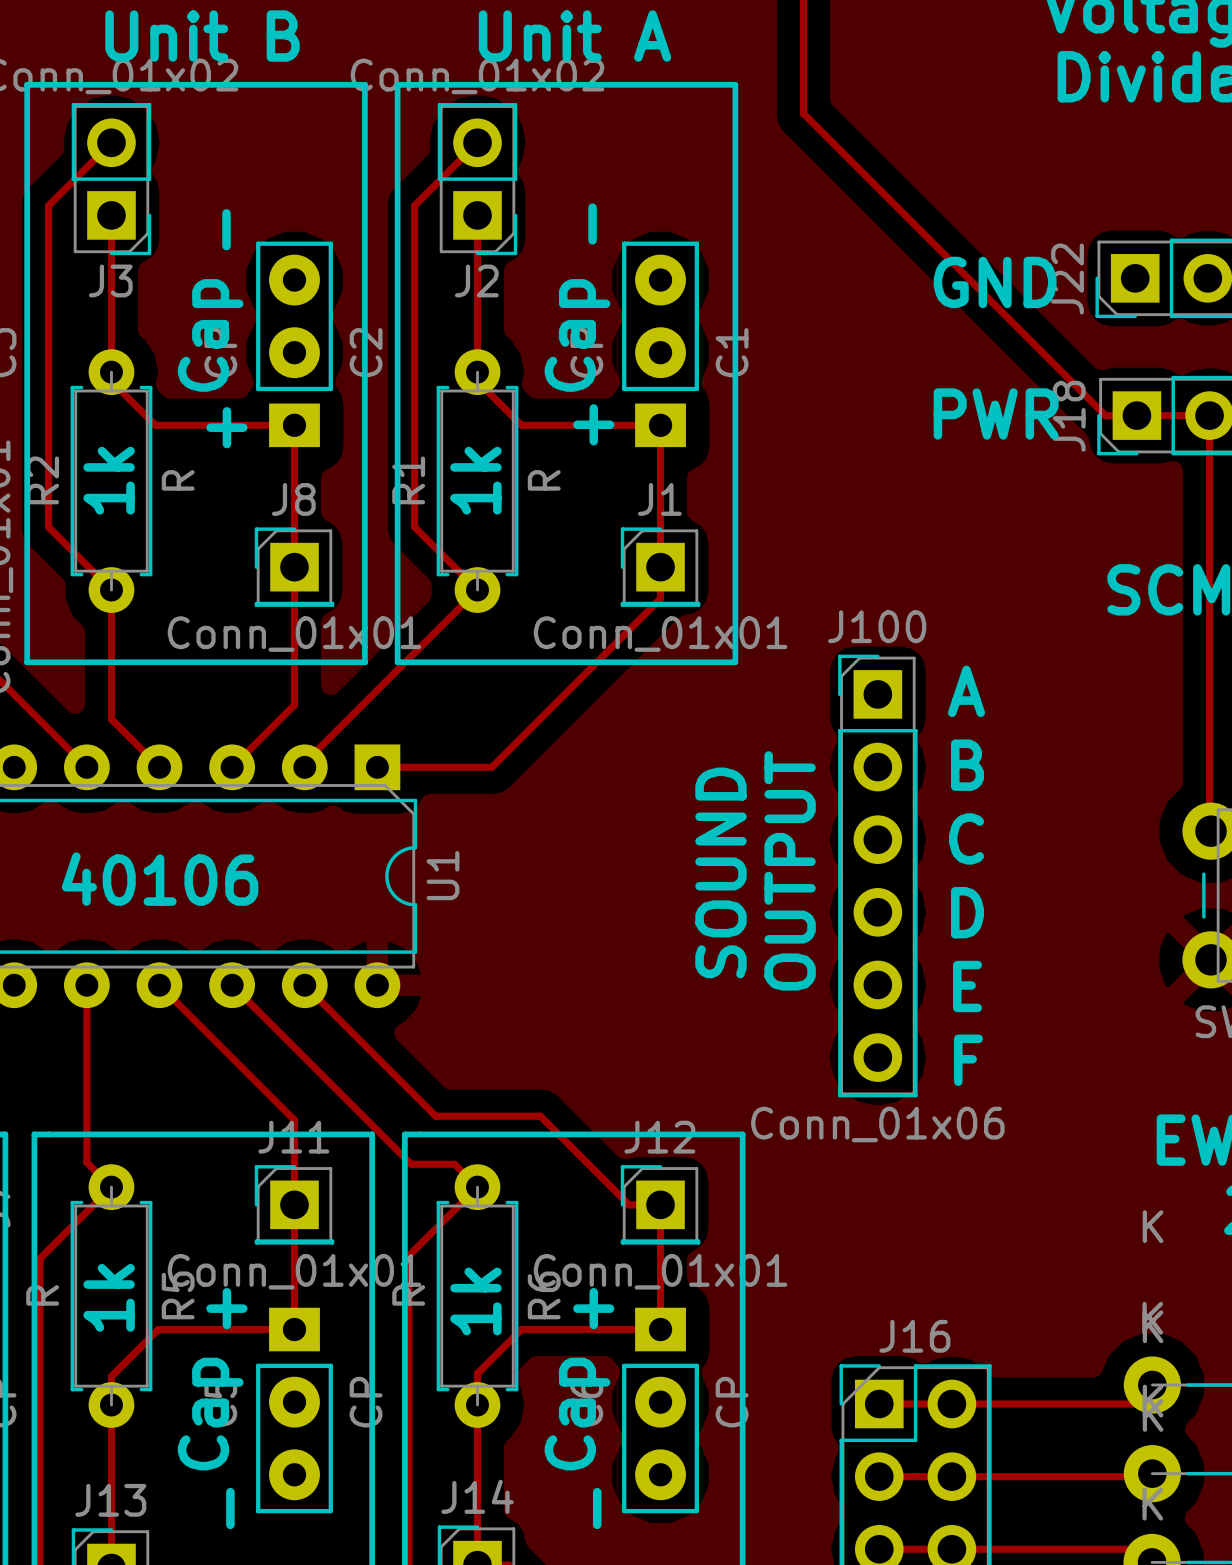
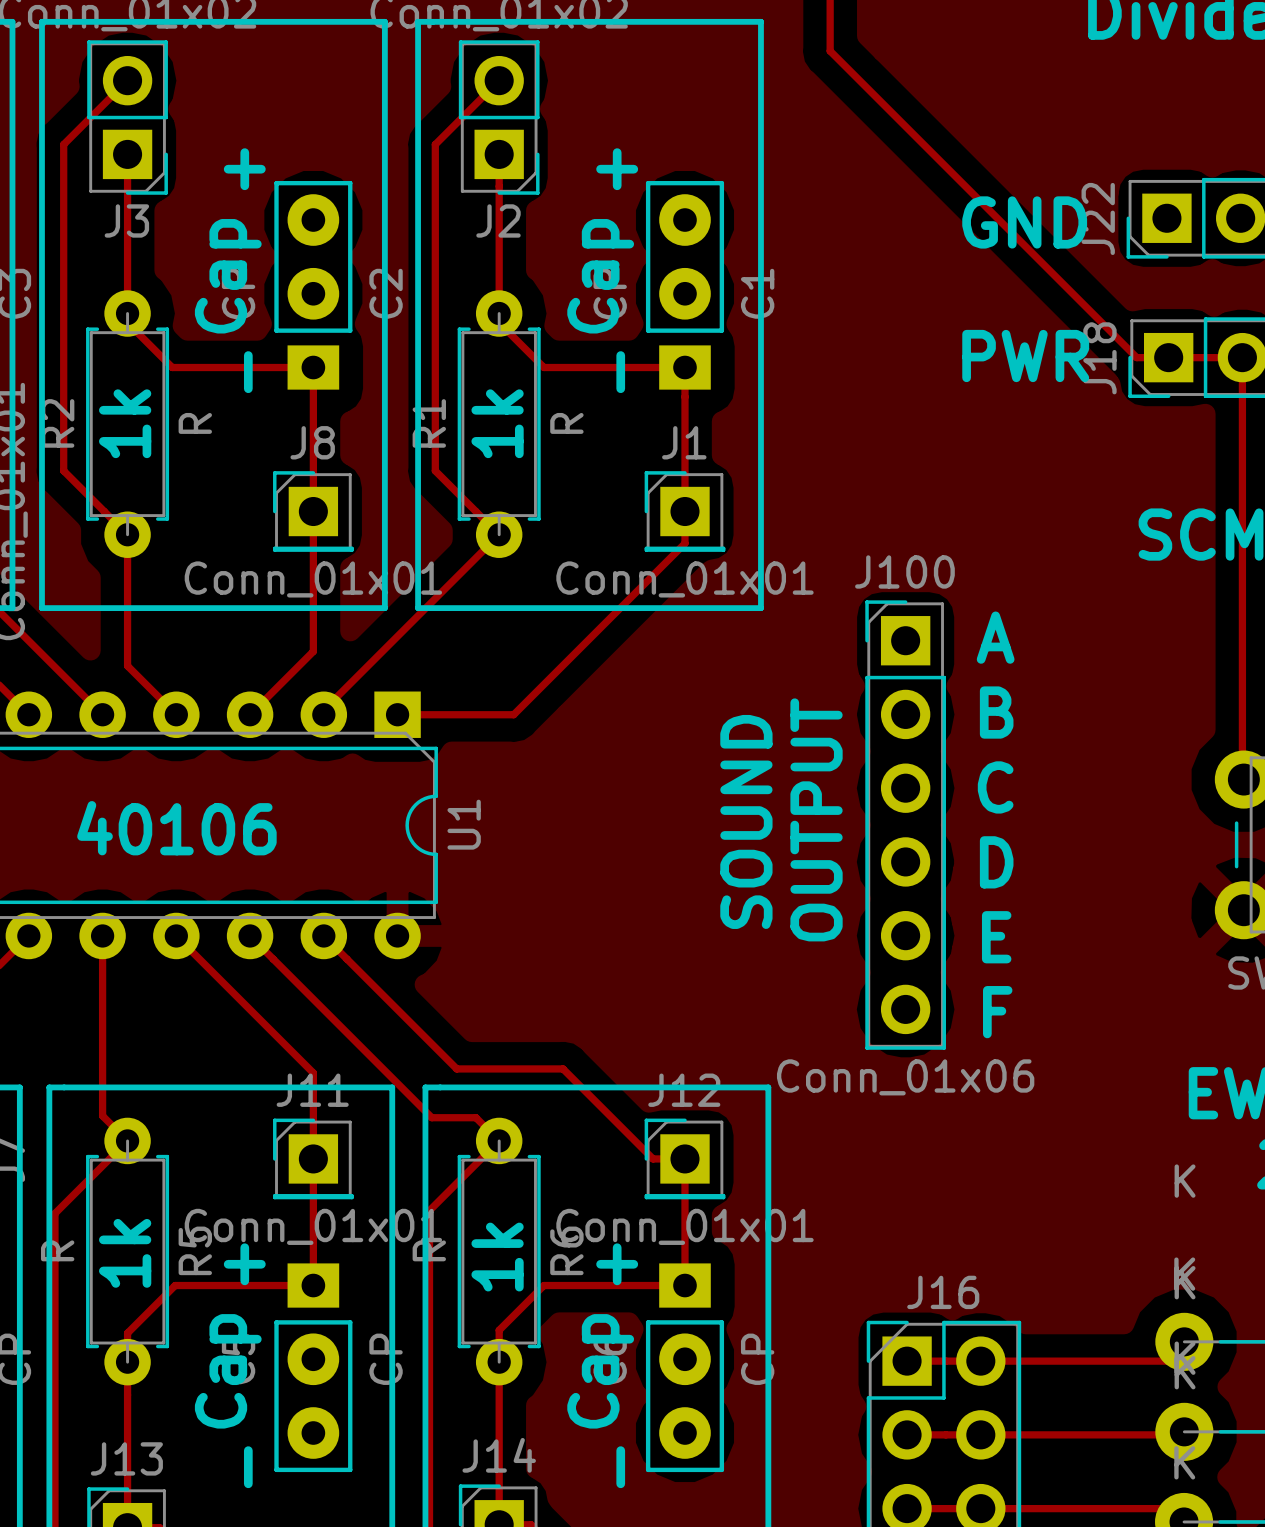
text: - (592, 224) -> + (617, 169)
text: - (226, 229) -> + (244, 169)
text: + (593, 424) -> - (620, 372)
text: + (226, 427) -> - (248, 372)

